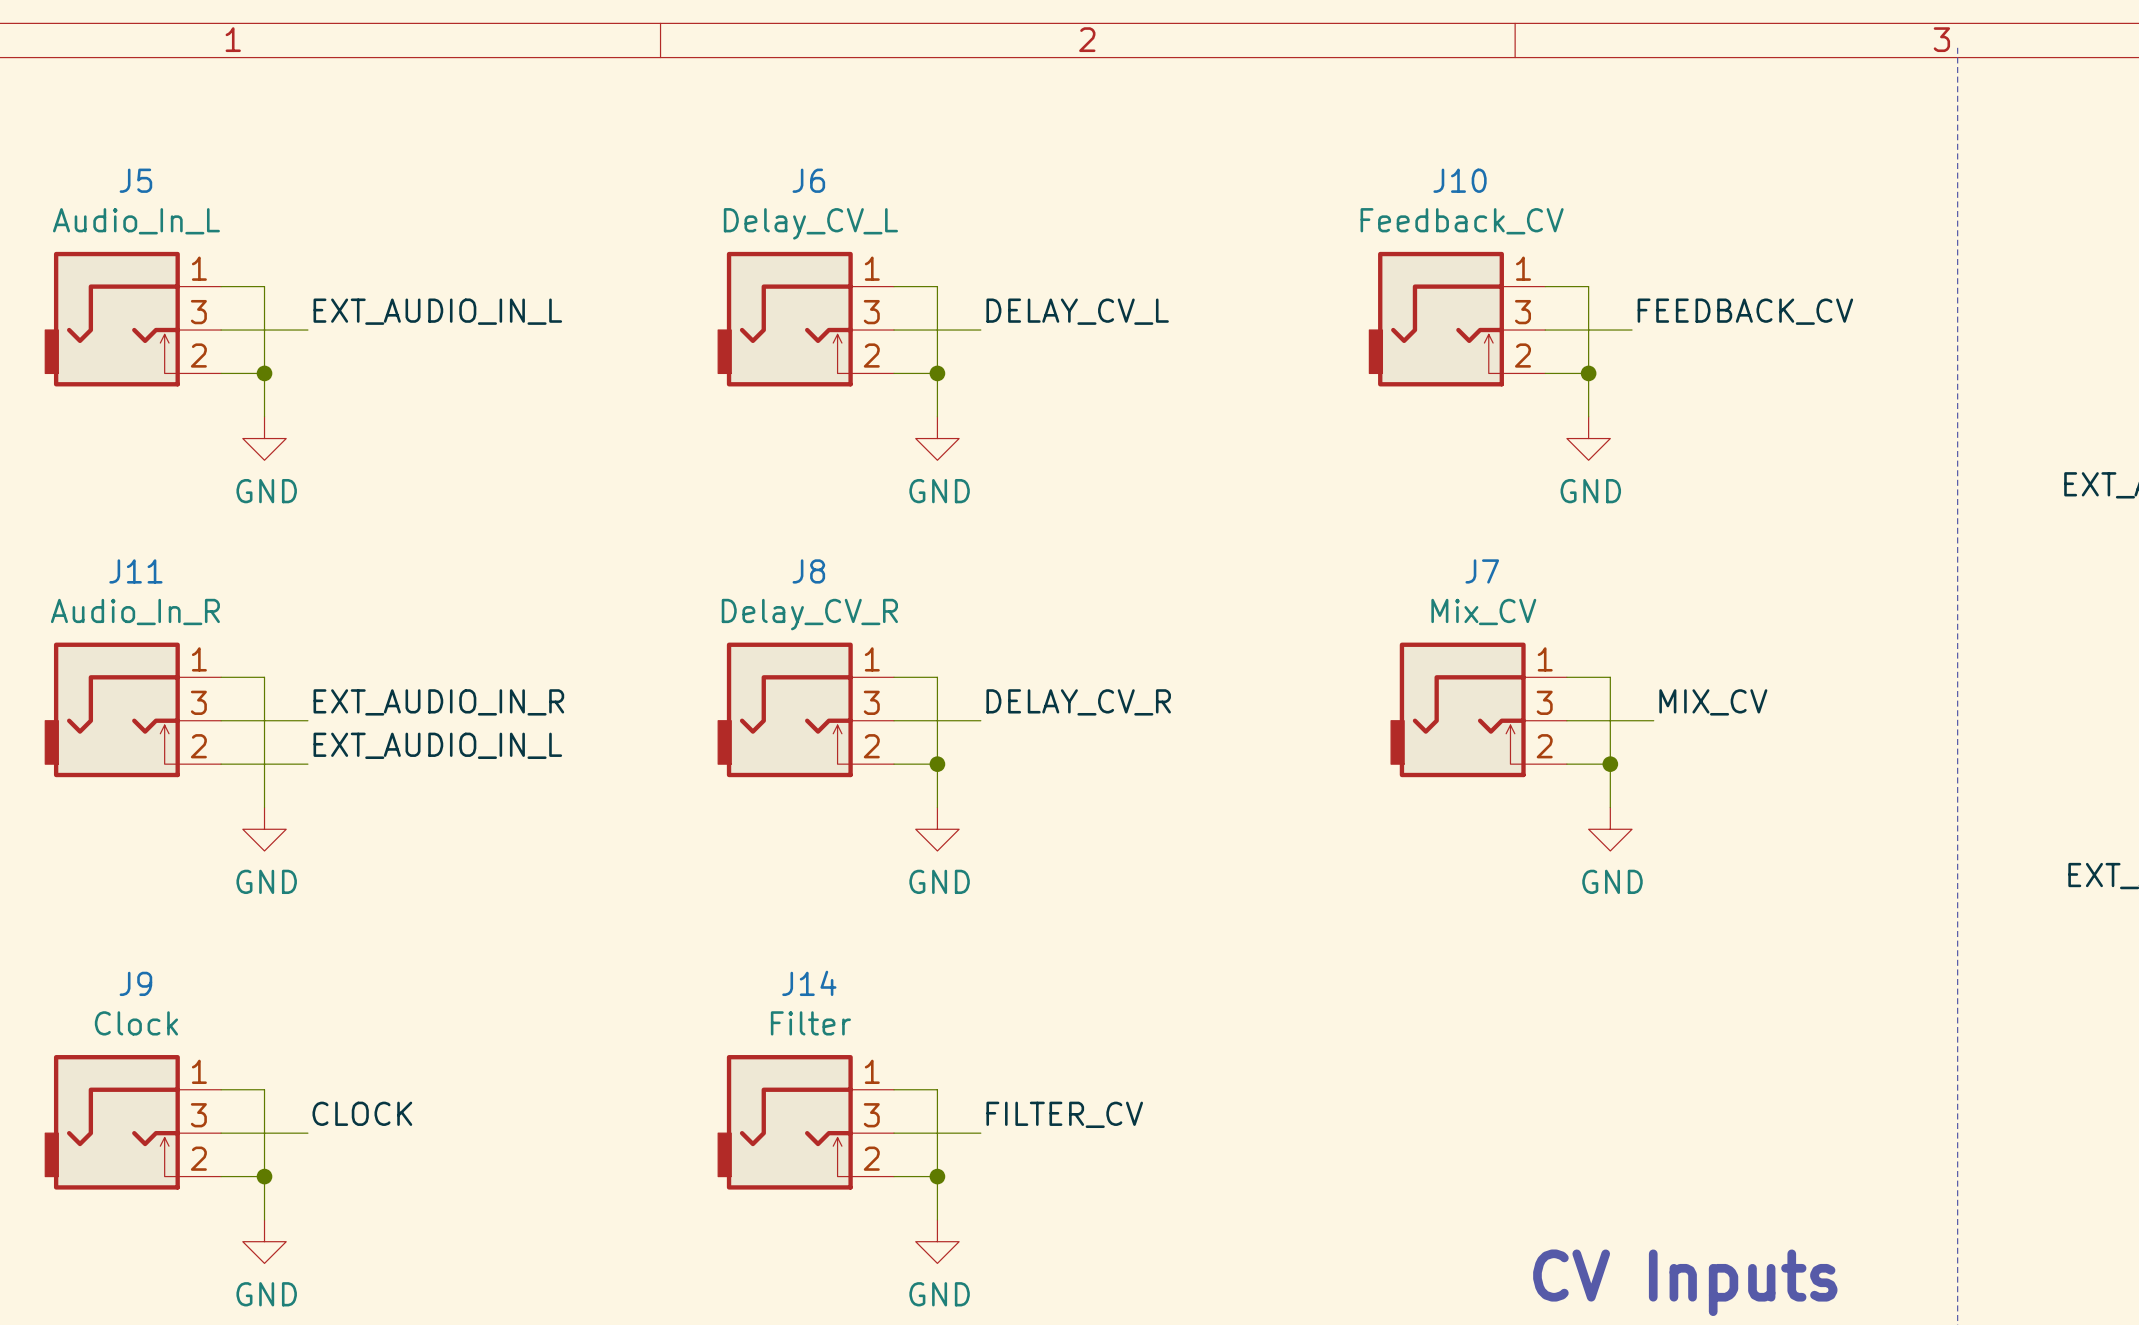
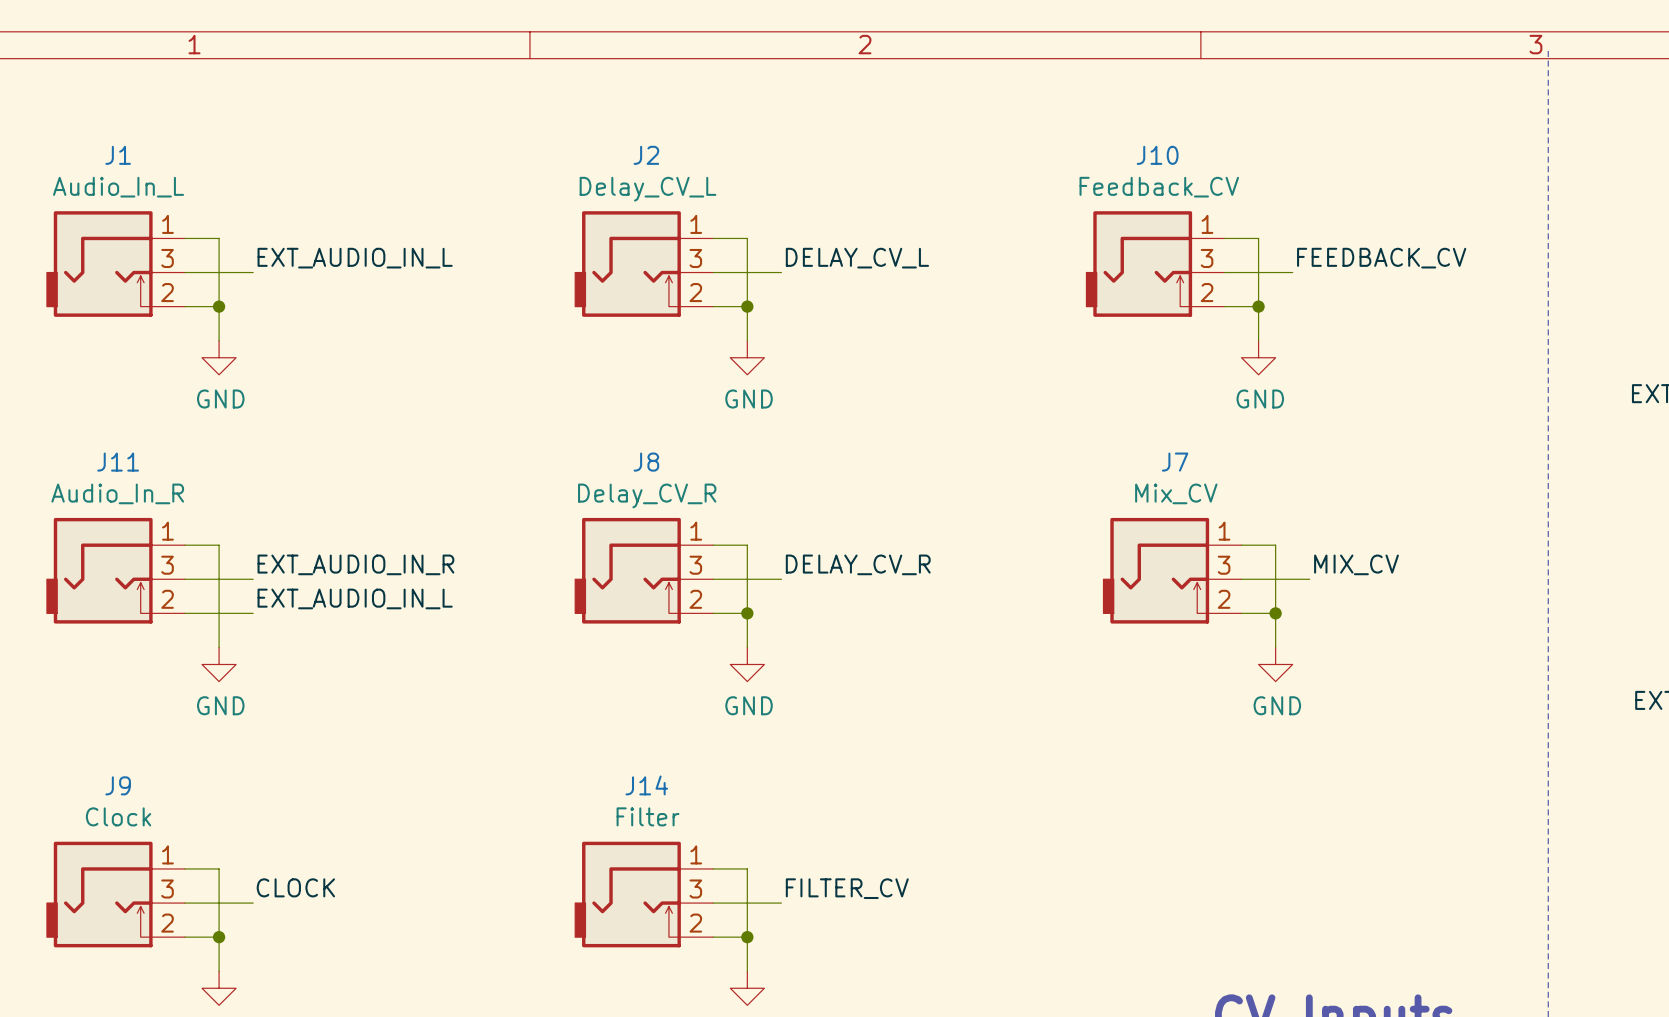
J5 name: J5 (135, 180) -> J1 (118, 155)
J6 name: J6 (808, 180) -> J2 (646, 155)

